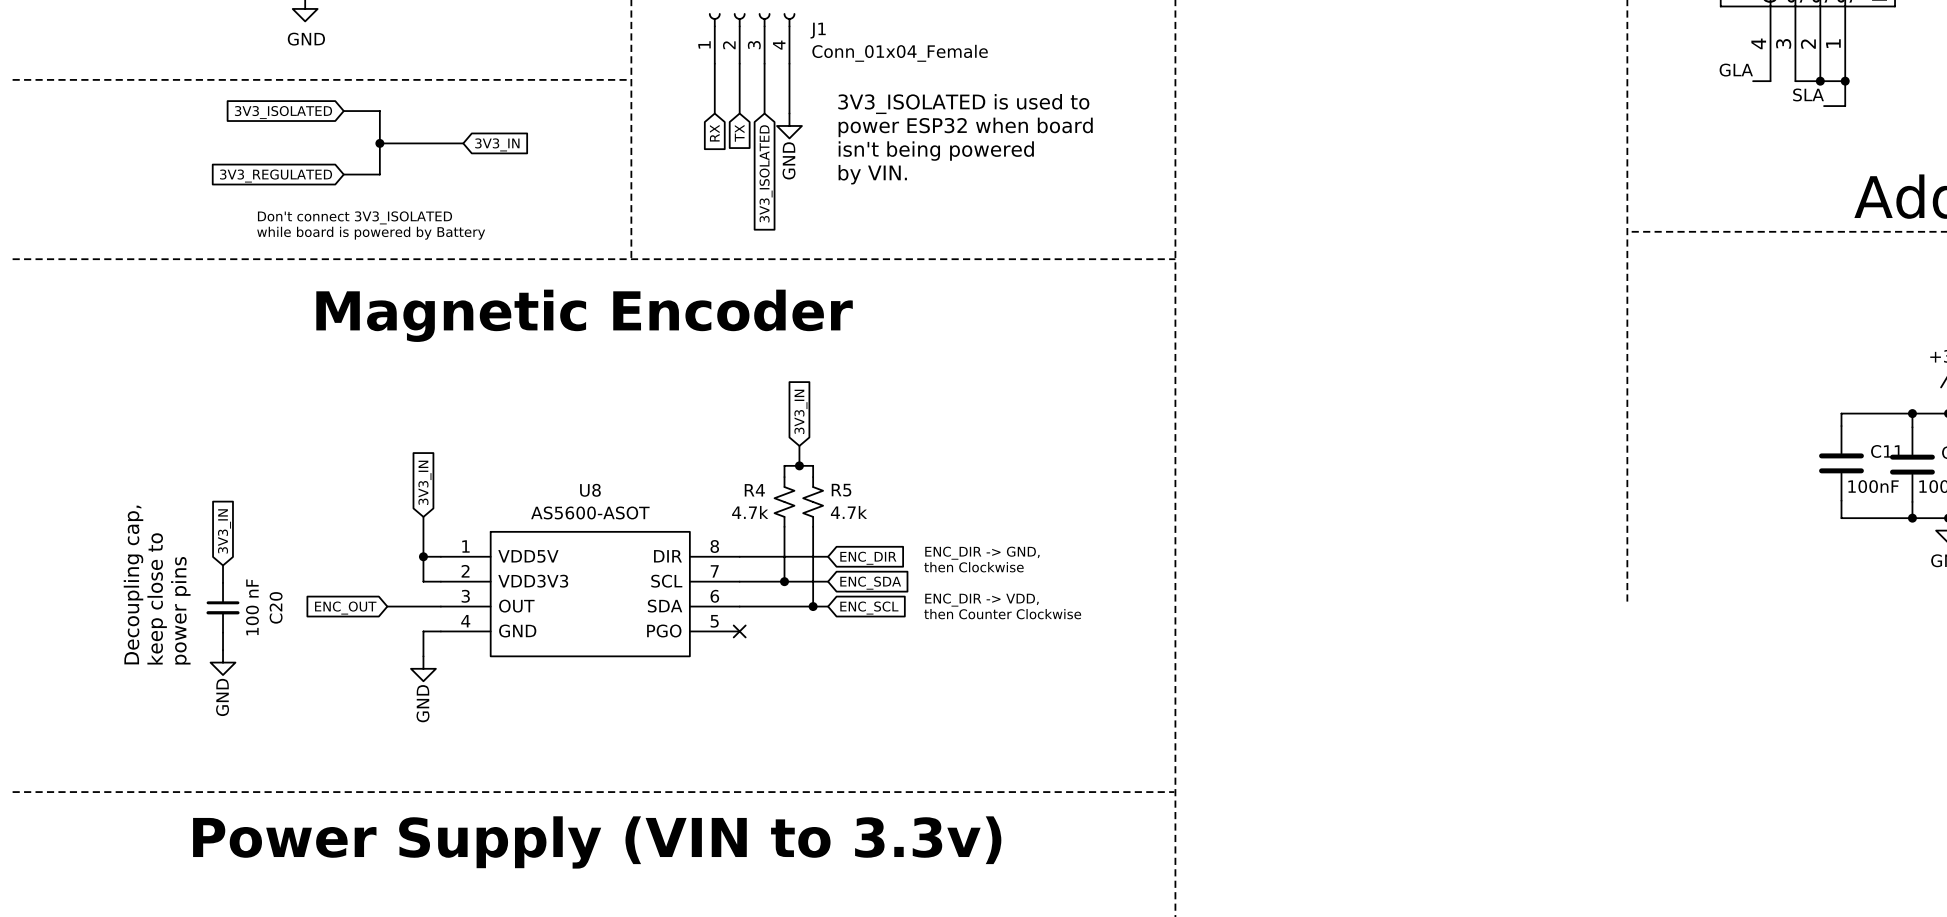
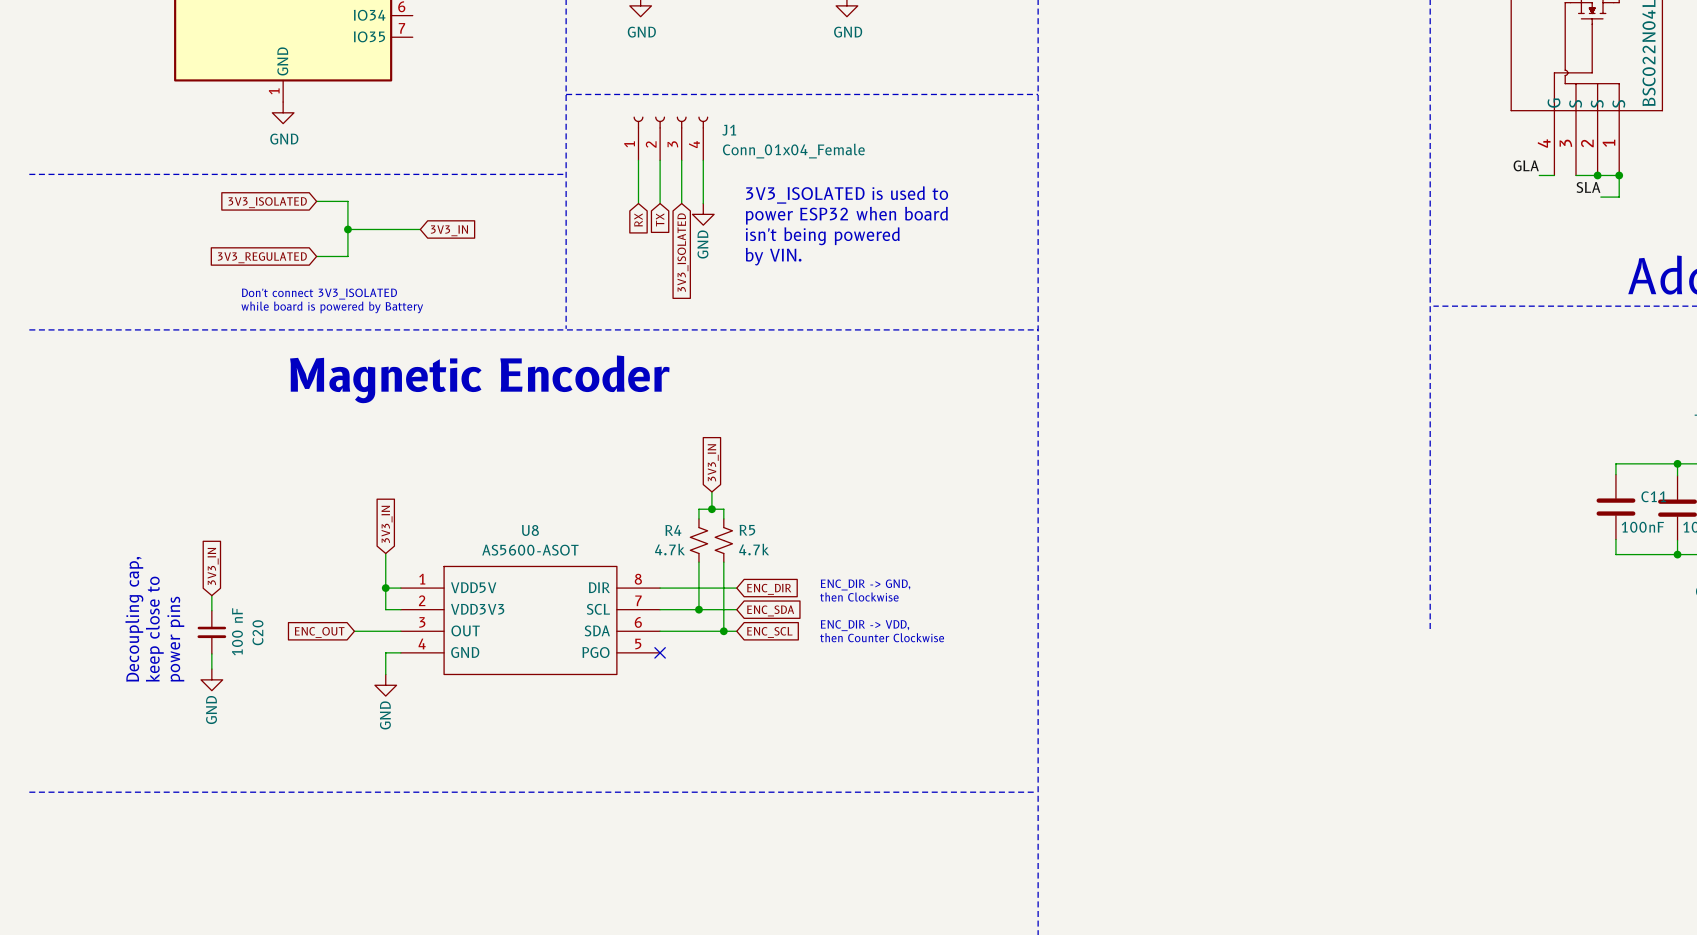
text: Power Supply (VIN to 3.3v) (597, 842) -> none

